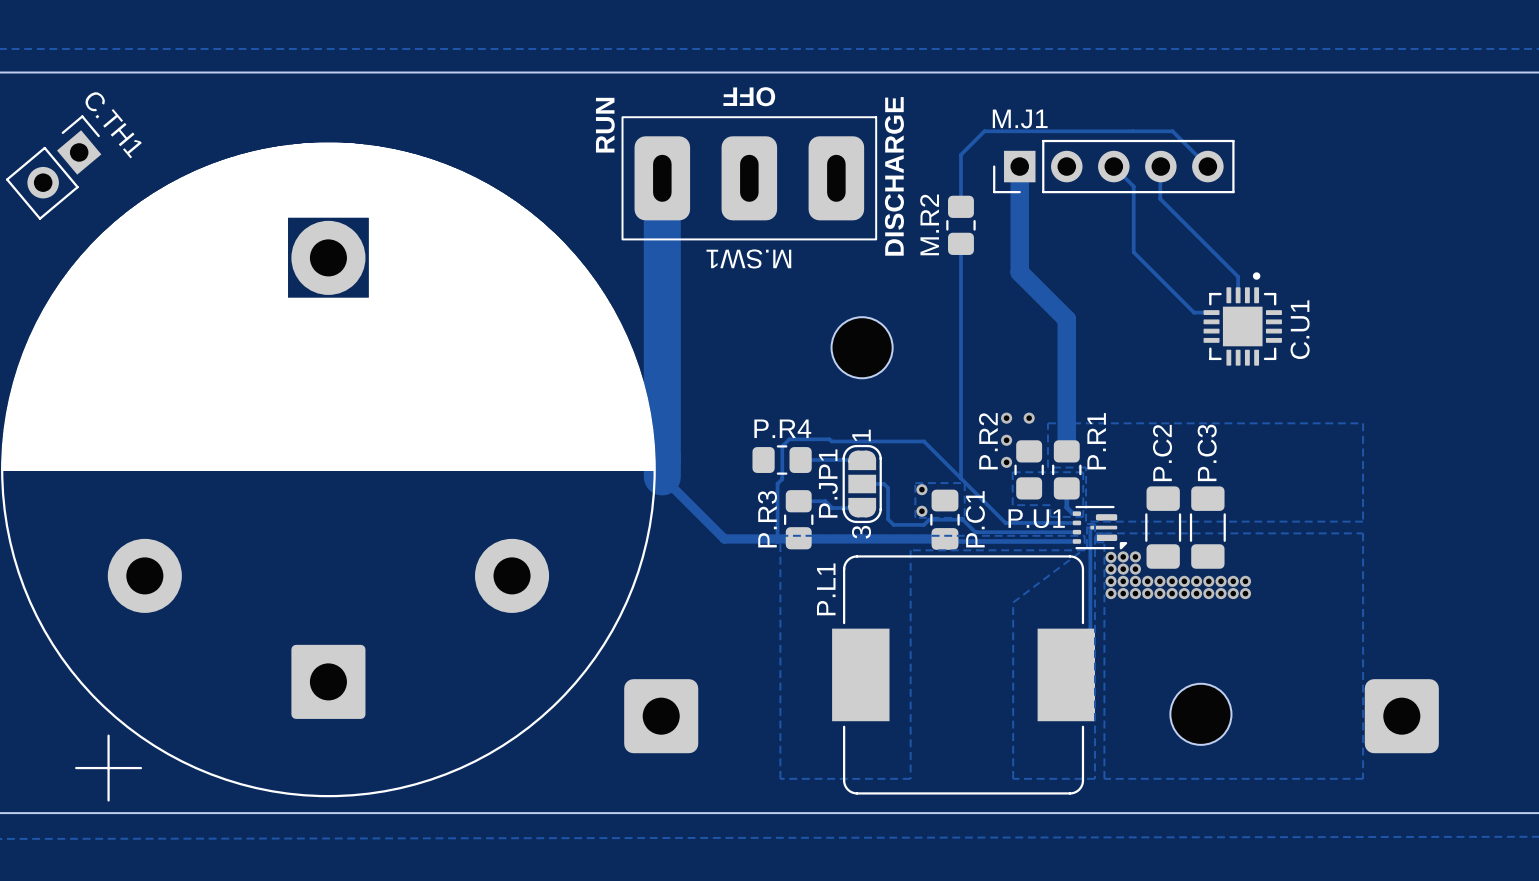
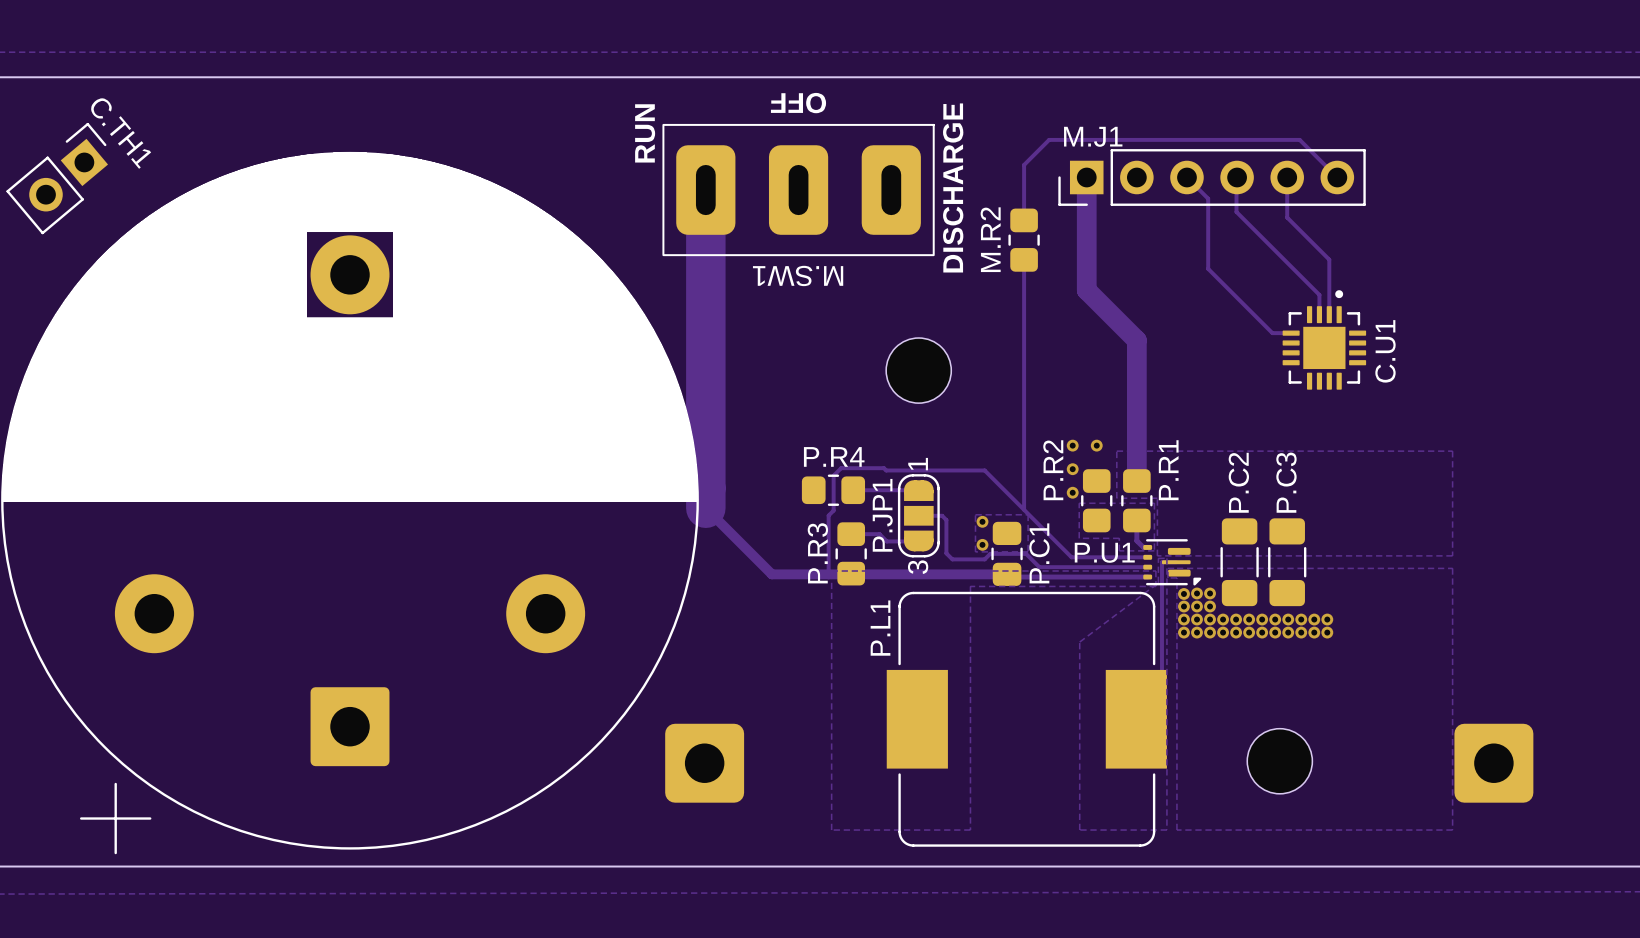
track: (1172, 131) (1207, 166) -> (1249, 139) (1299, 139) (1337, 177)
M.J1 footprint: [993, 139, 1235, 194] -> [1058, 149, 1366, 206]
track: none -> (1287, 177) (1287, 217) (1329, 259) (1329, 314)

